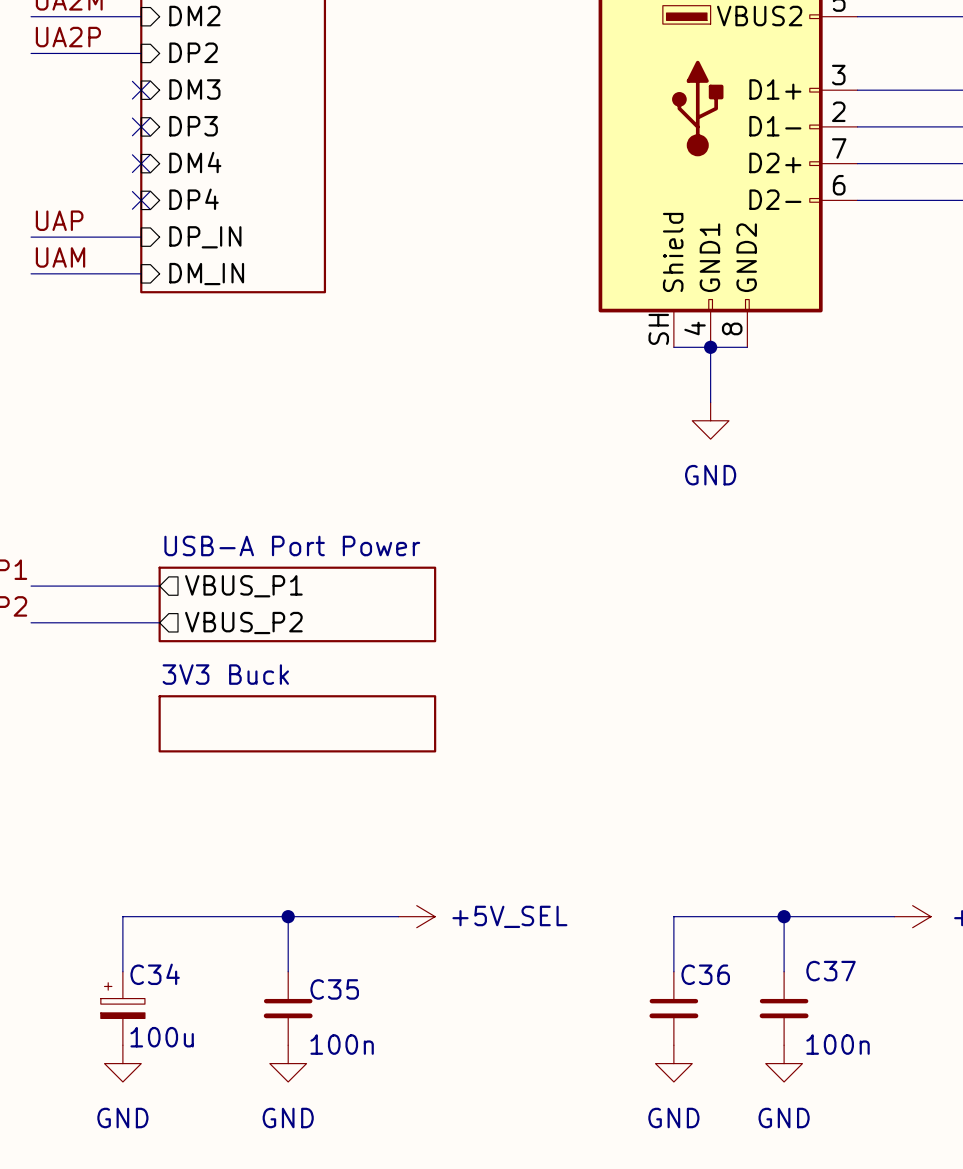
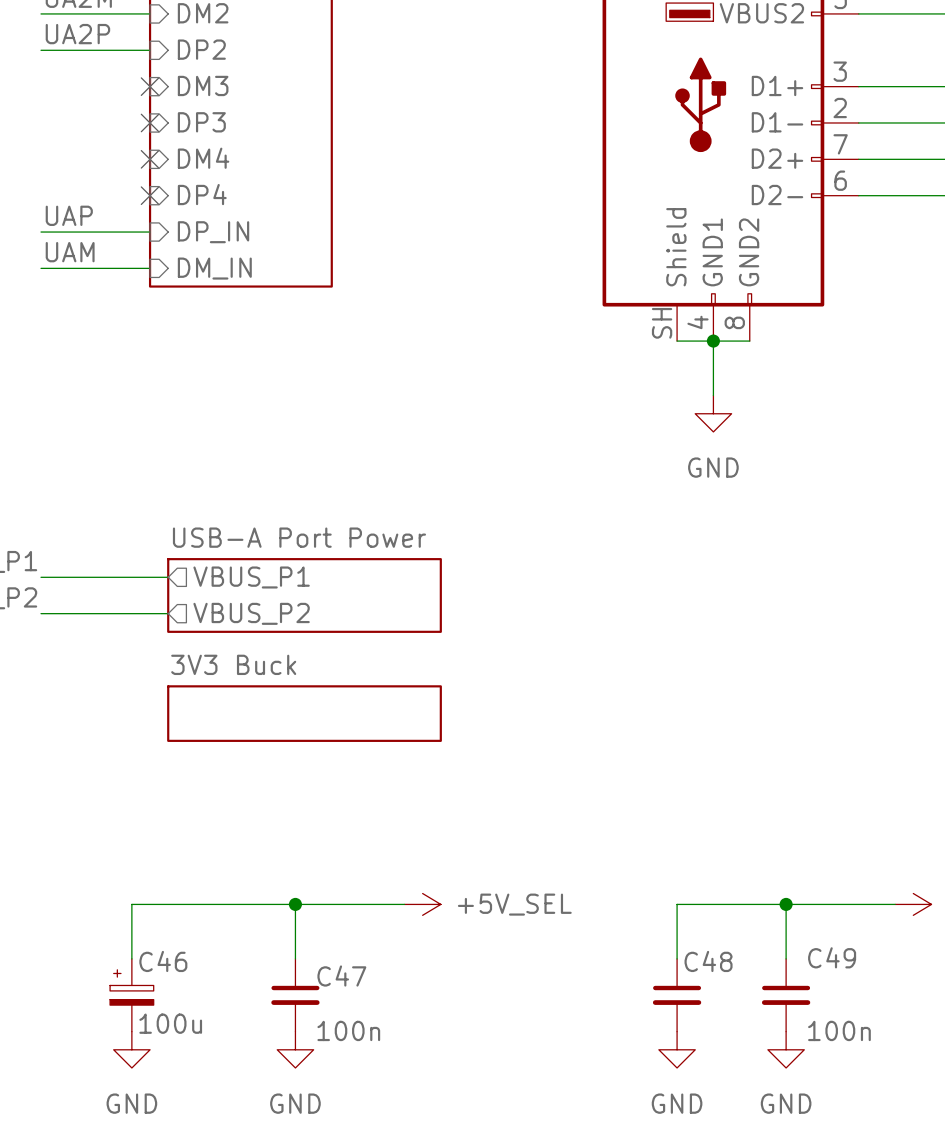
C37 name: C37 (831, 971) -> C49 (832, 957)
C34 name: C34 (155, 974) -> C46 (163, 961)
C36 name: C36 (705, 974) -> C48 (708, 961)
C35 name: C35 (334, 989) -> C47 (341, 976)

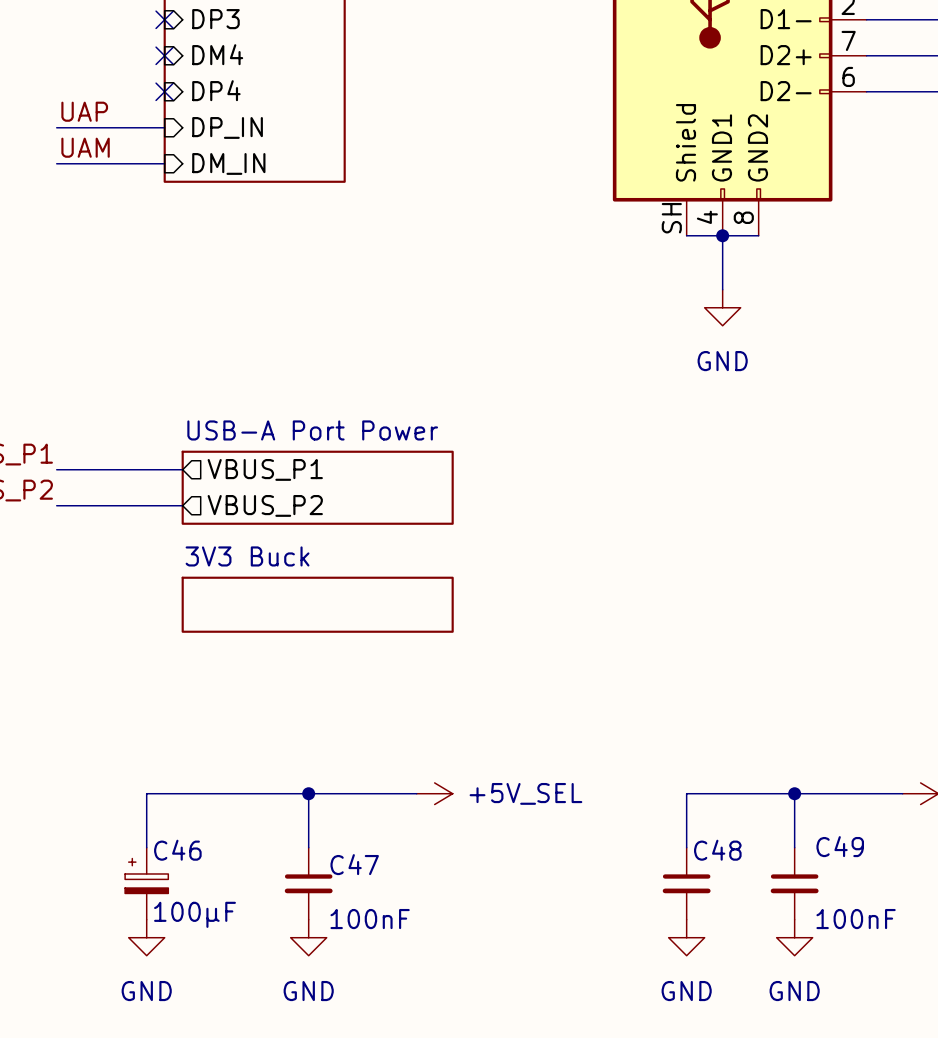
C46 value: 100u (170, 1023) -> 100µF (195, 914)
C47 value: 100n (348, 1030) -> 100nF (370, 919)
C49 value: 100n (839, 1030) -> 100nF (856, 919)

